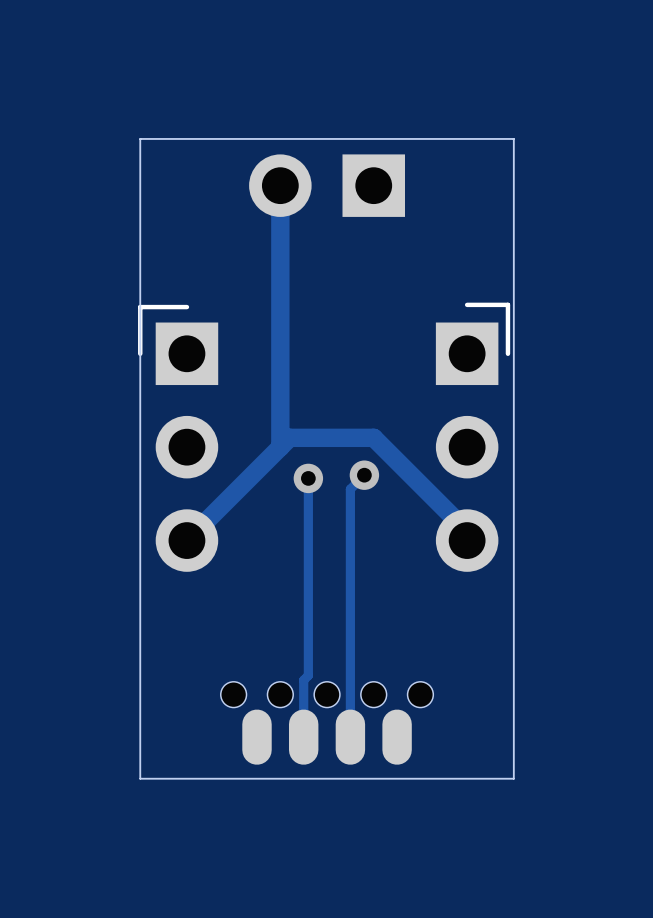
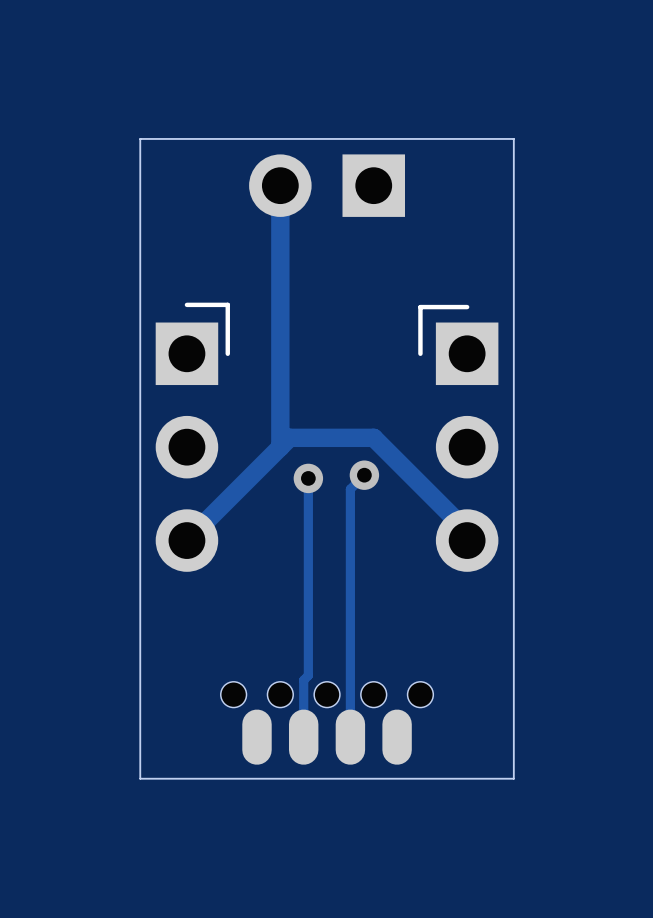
part footprint: [435, 302, 511, 572] -> [418, 304, 499, 572]
part footprint: [138, 304, 219, 572] -> [155, 302, 230, 572]

